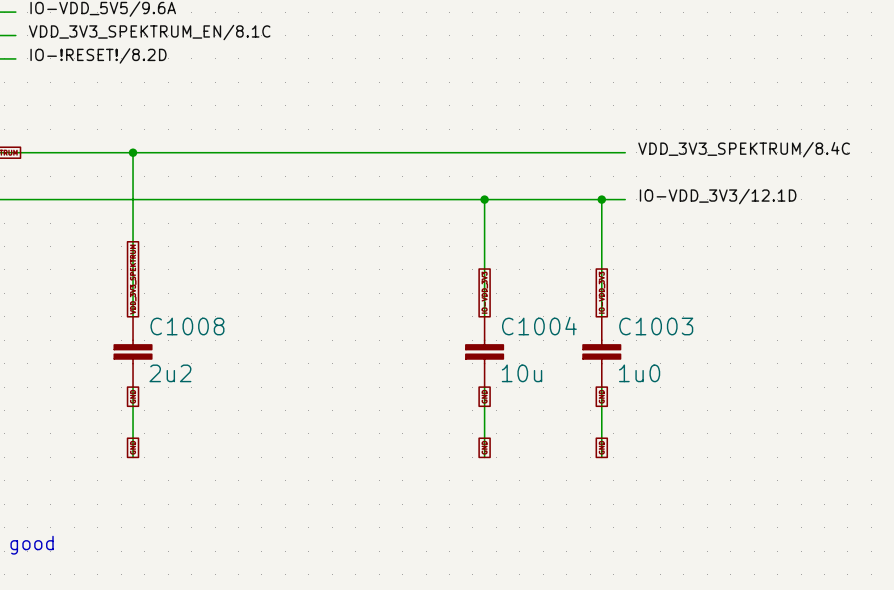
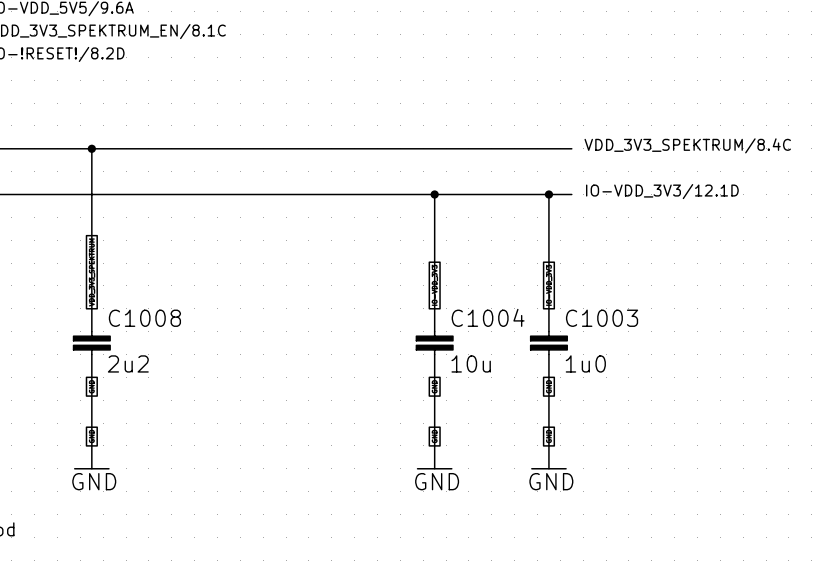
power symbol: none -> GND (91, 457)
power symbol: none -> GND (434, 457)
power symbol: none -> GND (548, 457)

